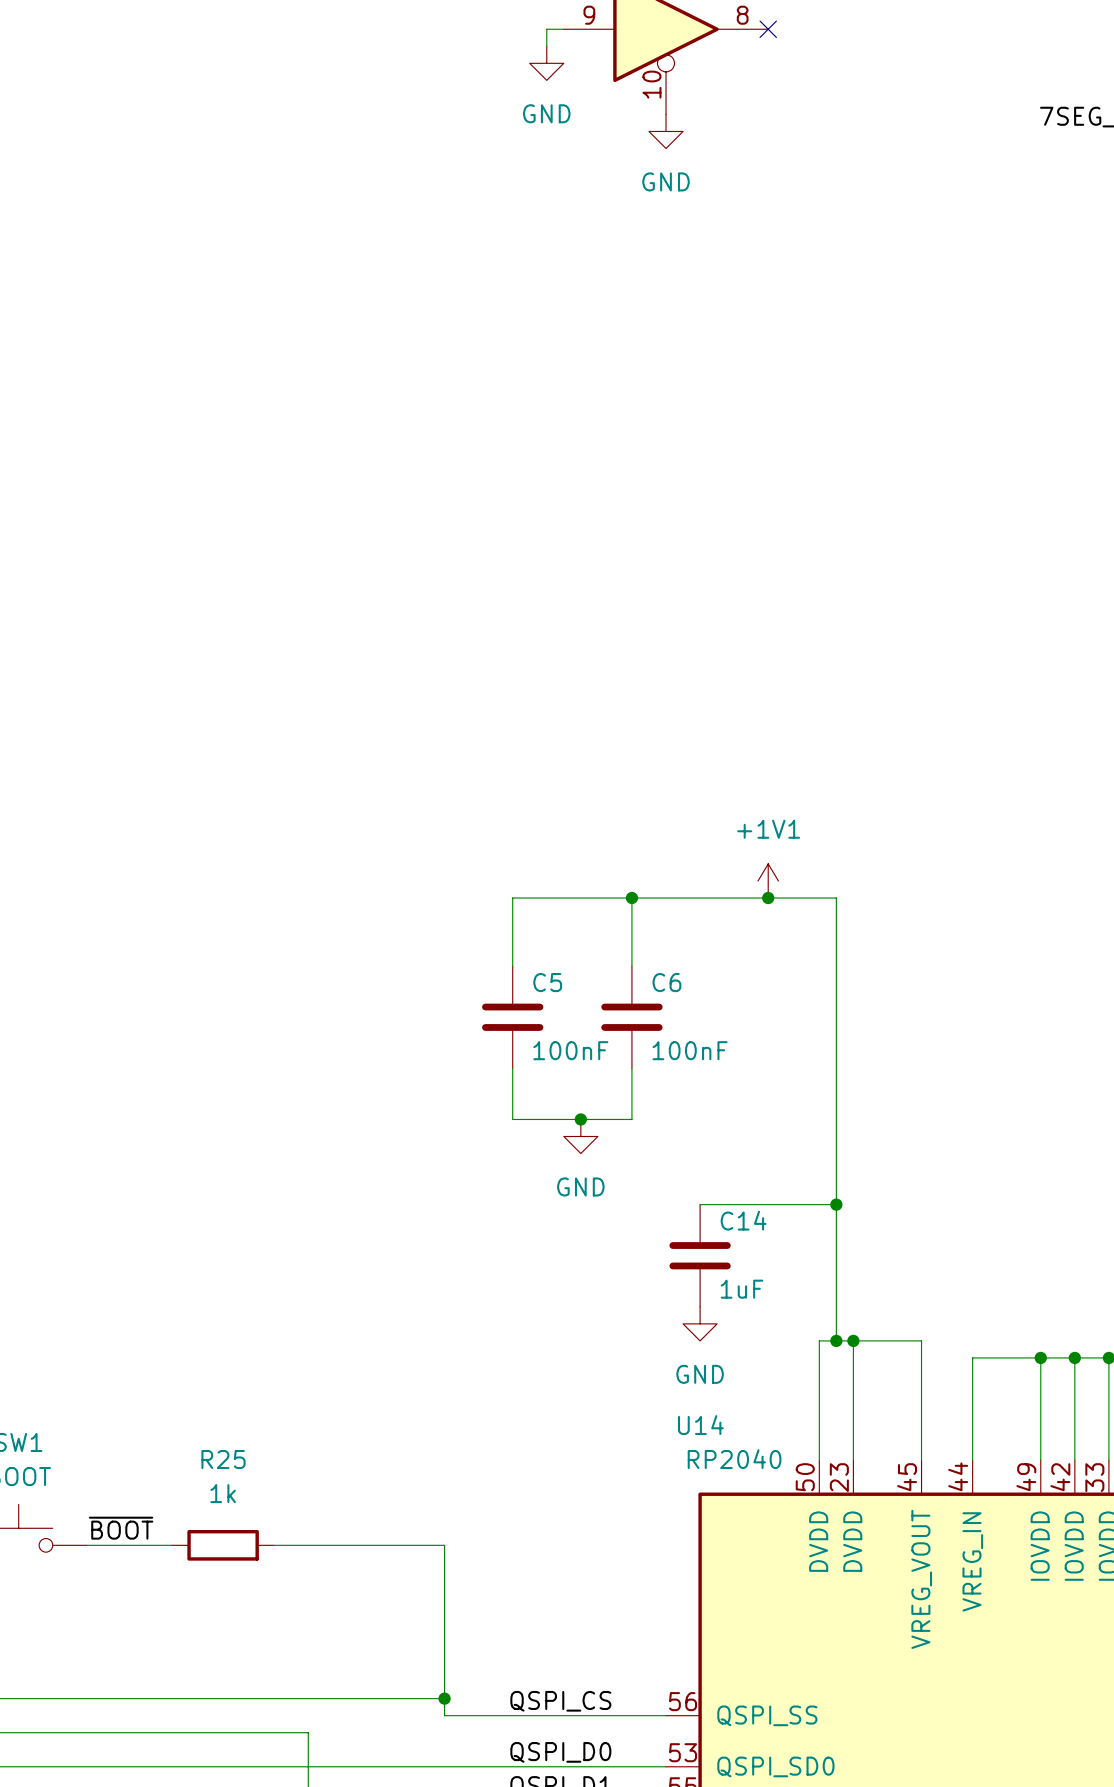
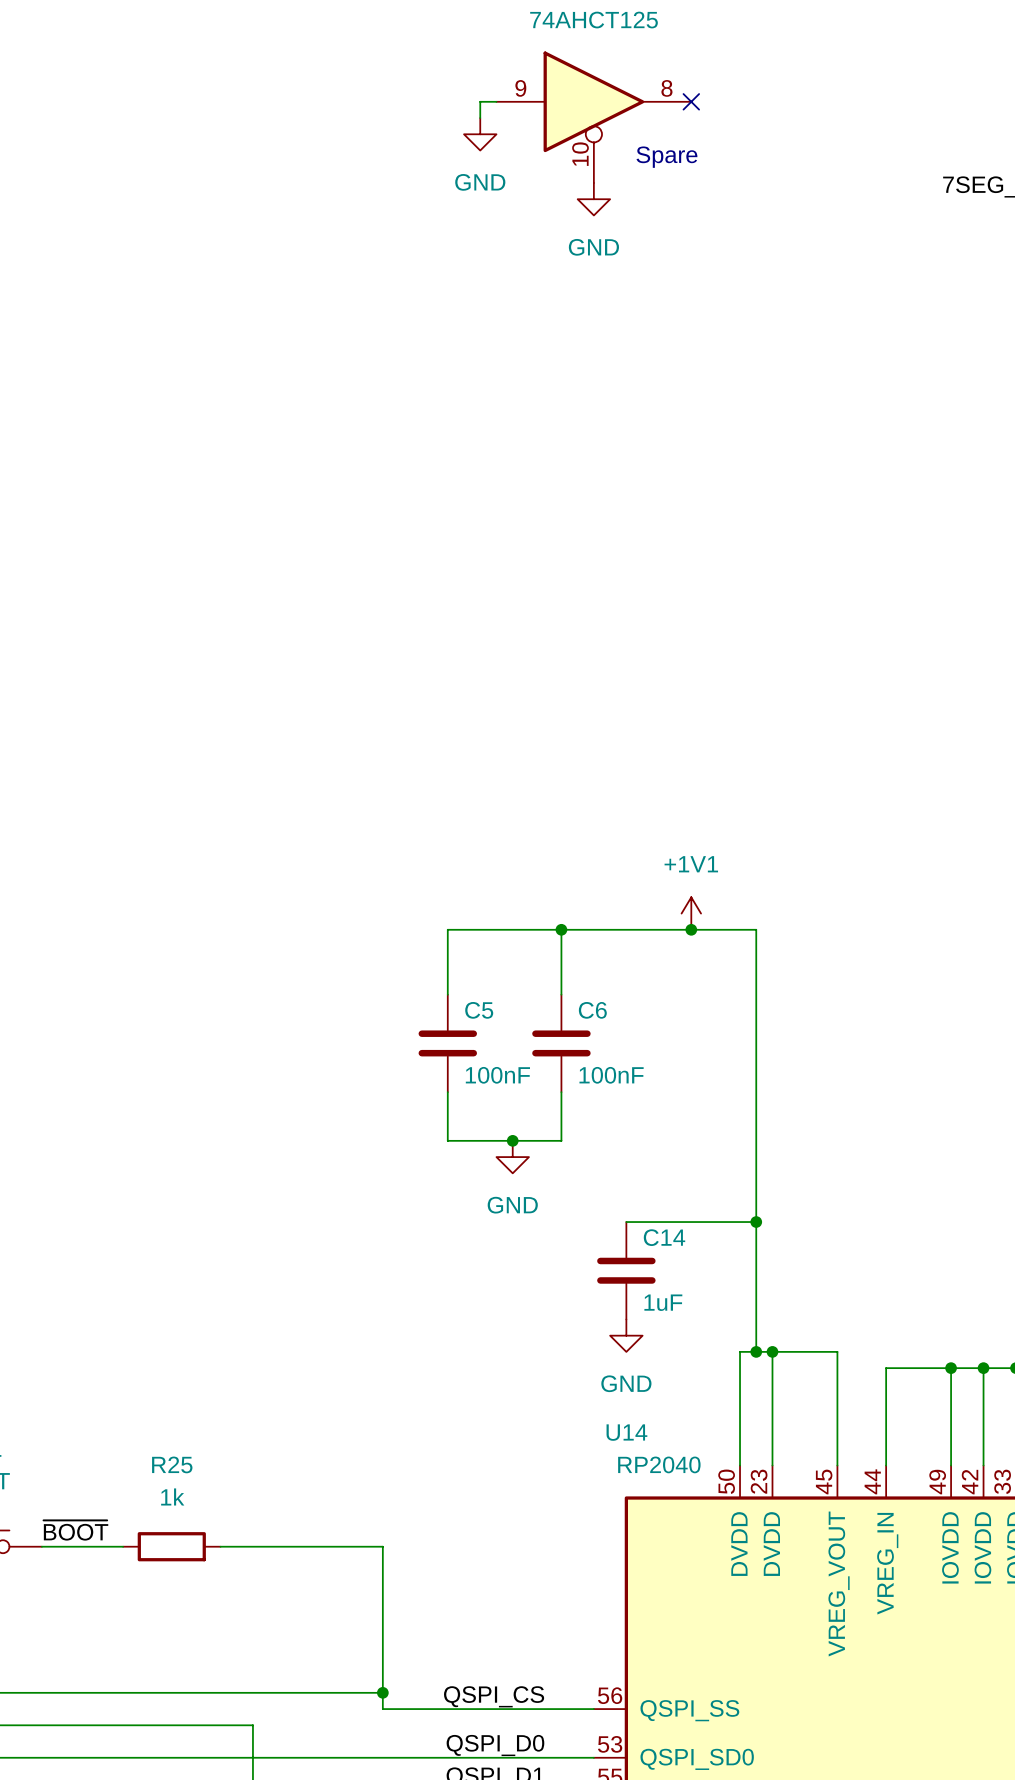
text: none -> Spare (666, 157)

